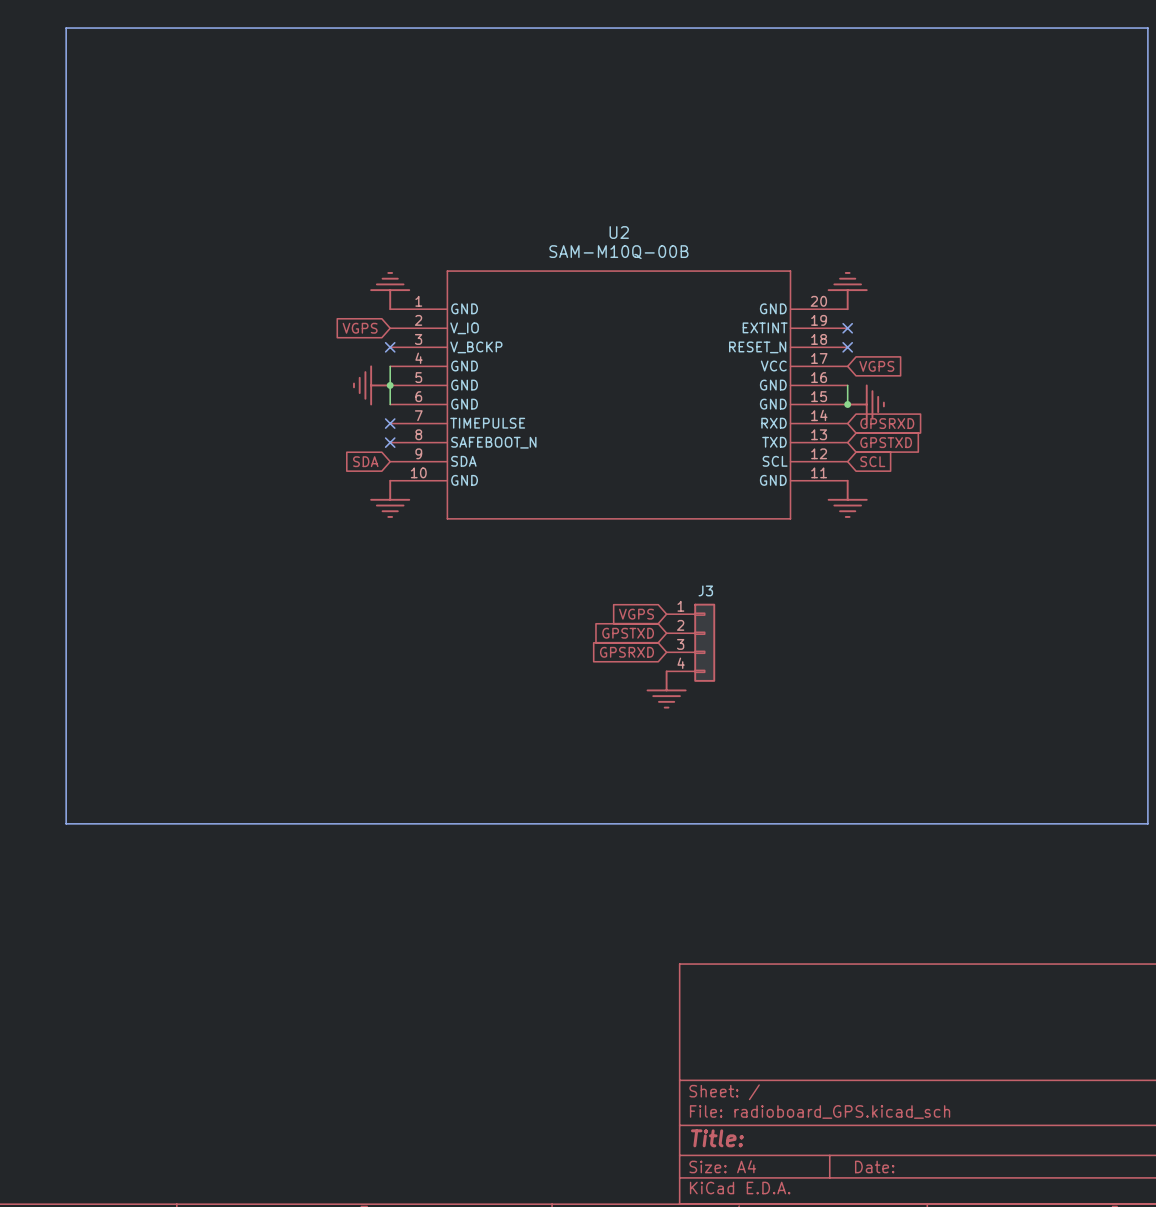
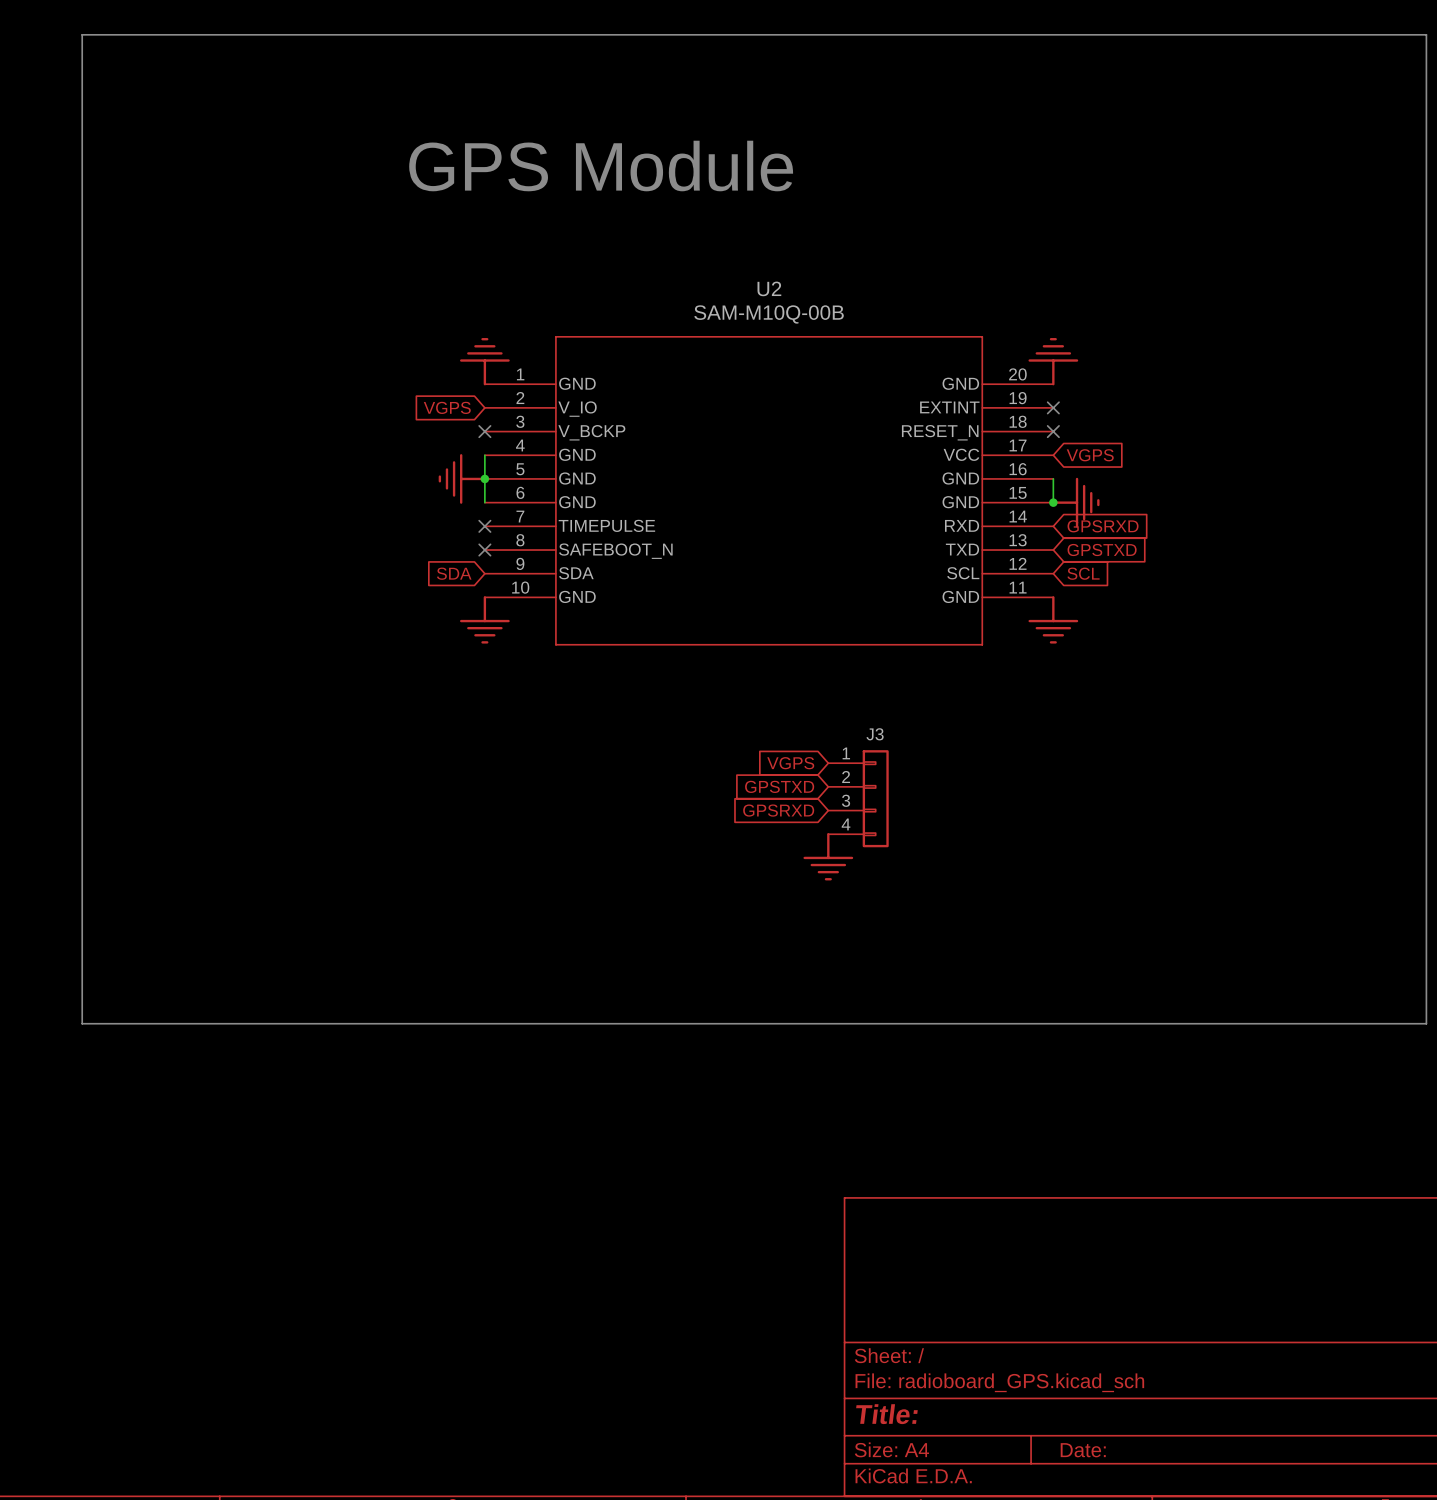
text: none -> GPS Module (601, 166)

